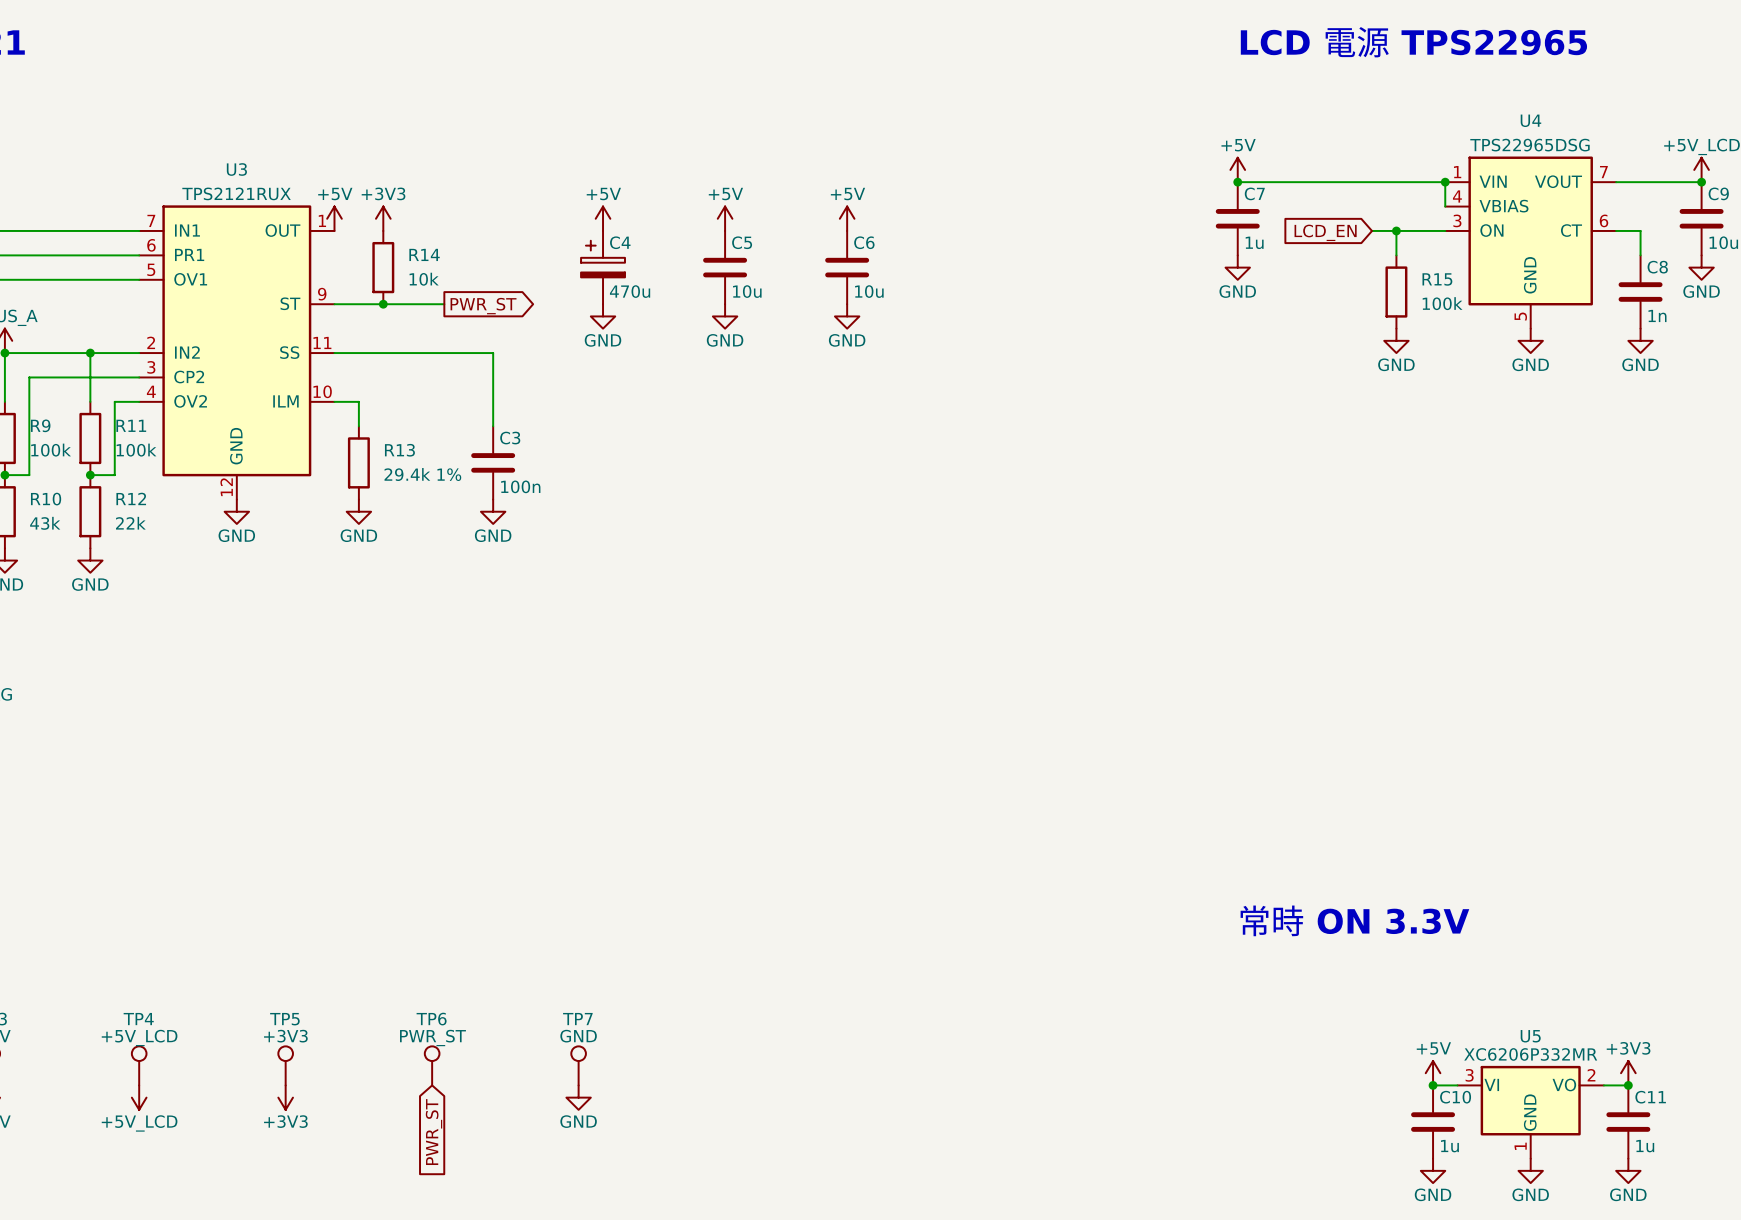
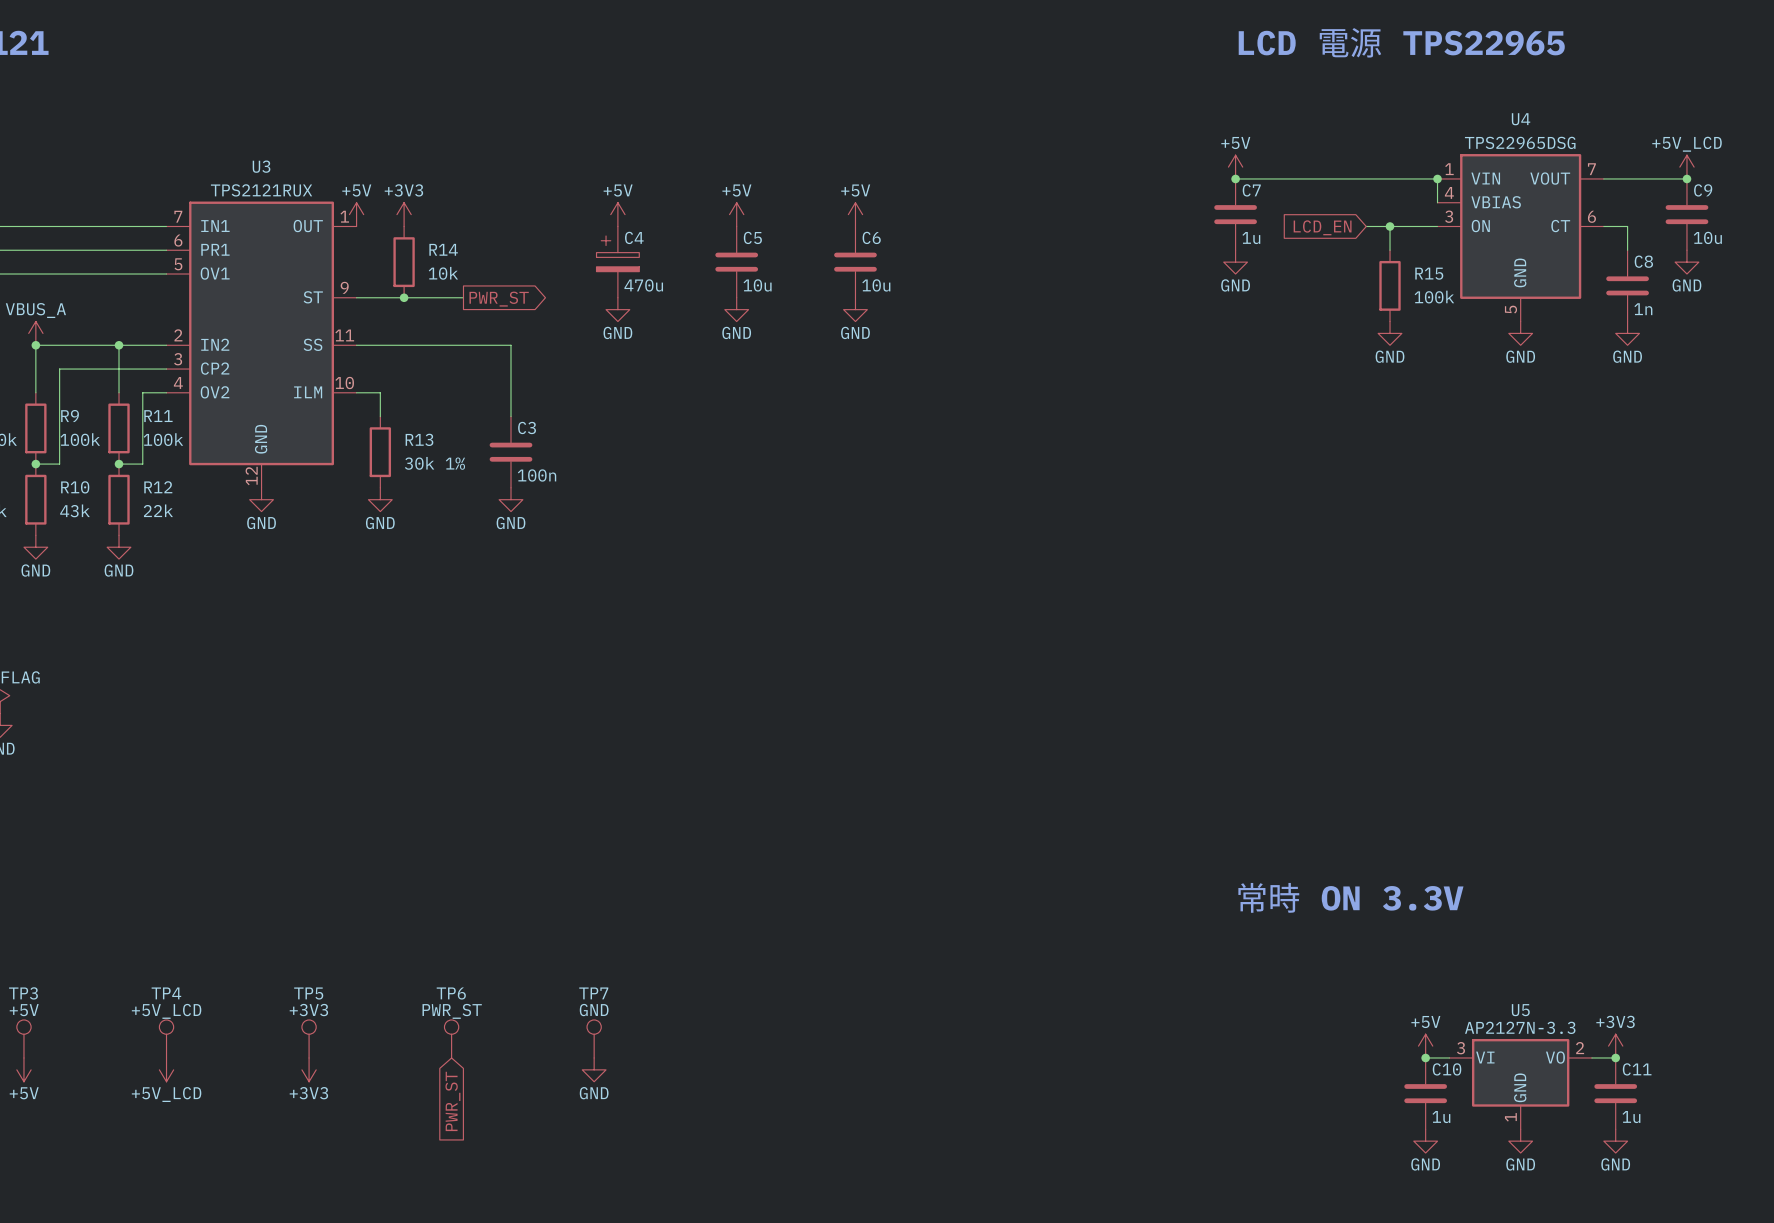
R13 value: 29.4k 1% (422, 474) -> 30k 1% (434, 463)
U5 value: XC6206P332MR (1530, 1054) -> AP2127N-3.3 (1520, 1027)

